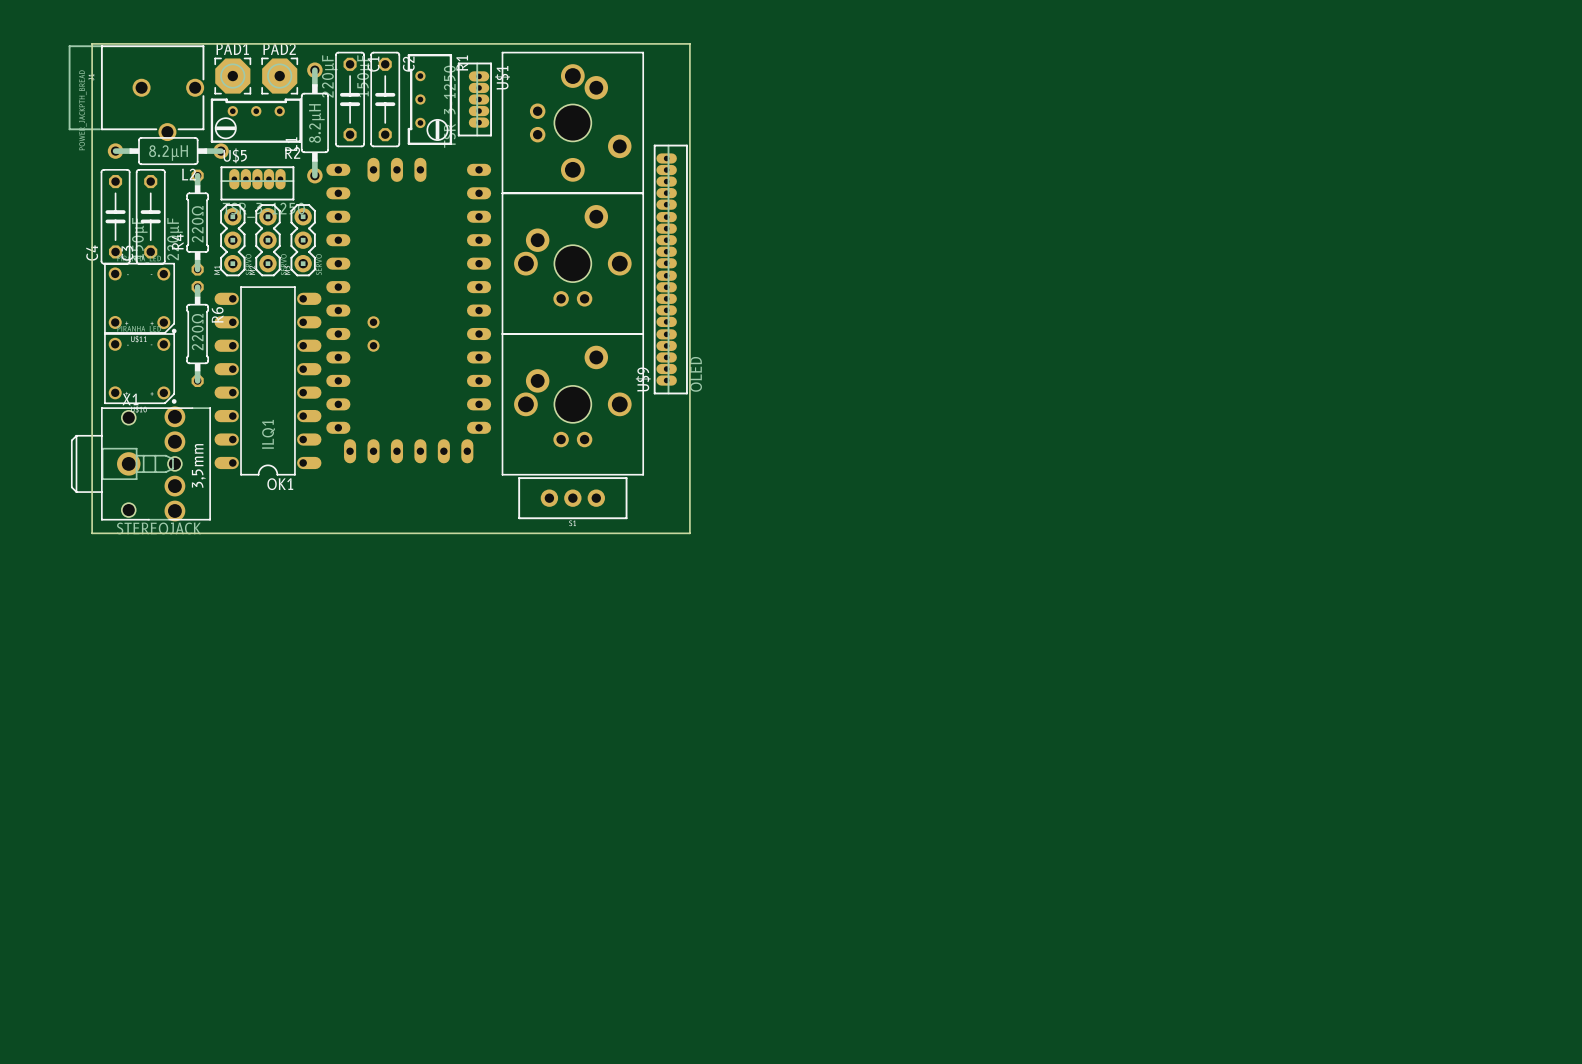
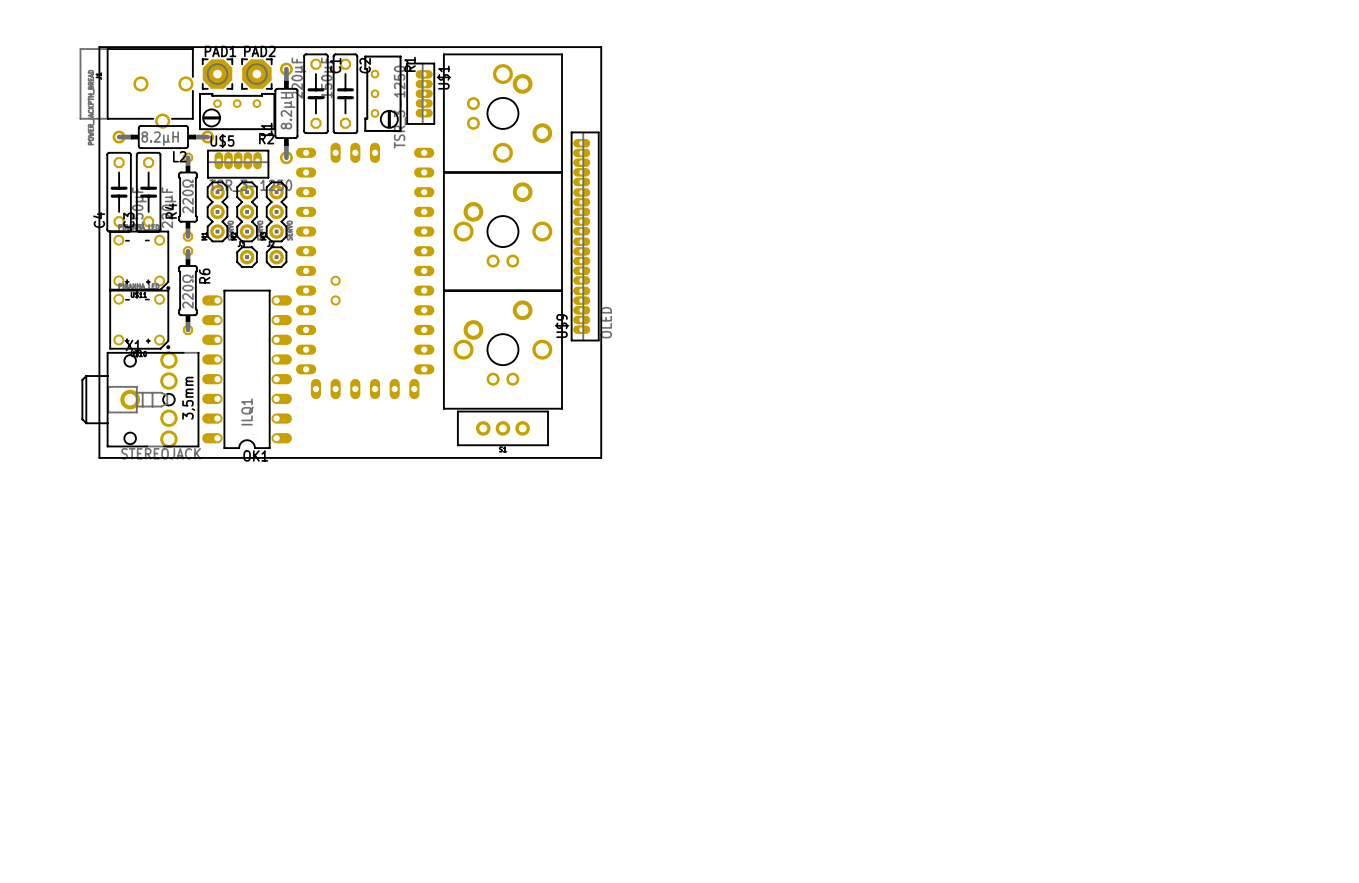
part: none -> (247, 257)
part: none -> (276, 257)
OK1 position: (267, 380) -> (247, 369)

